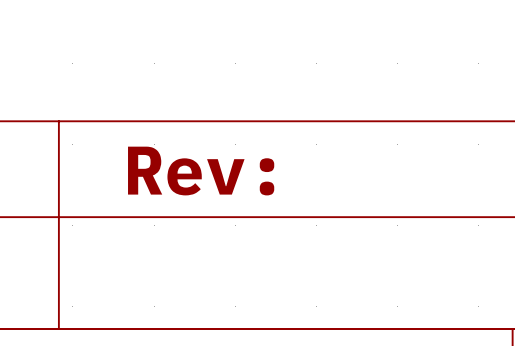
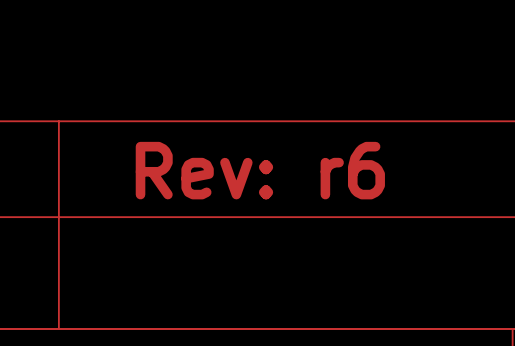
title block: Rev: (201, 171) -> Rev: r6 (260, 170)

